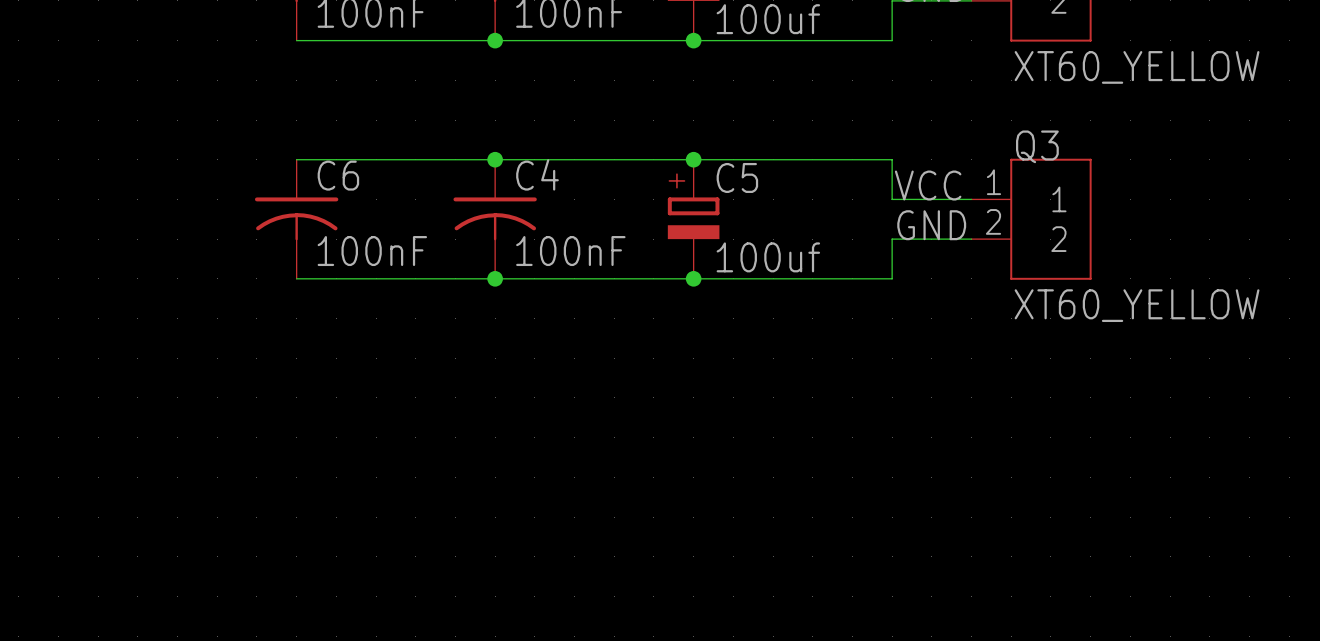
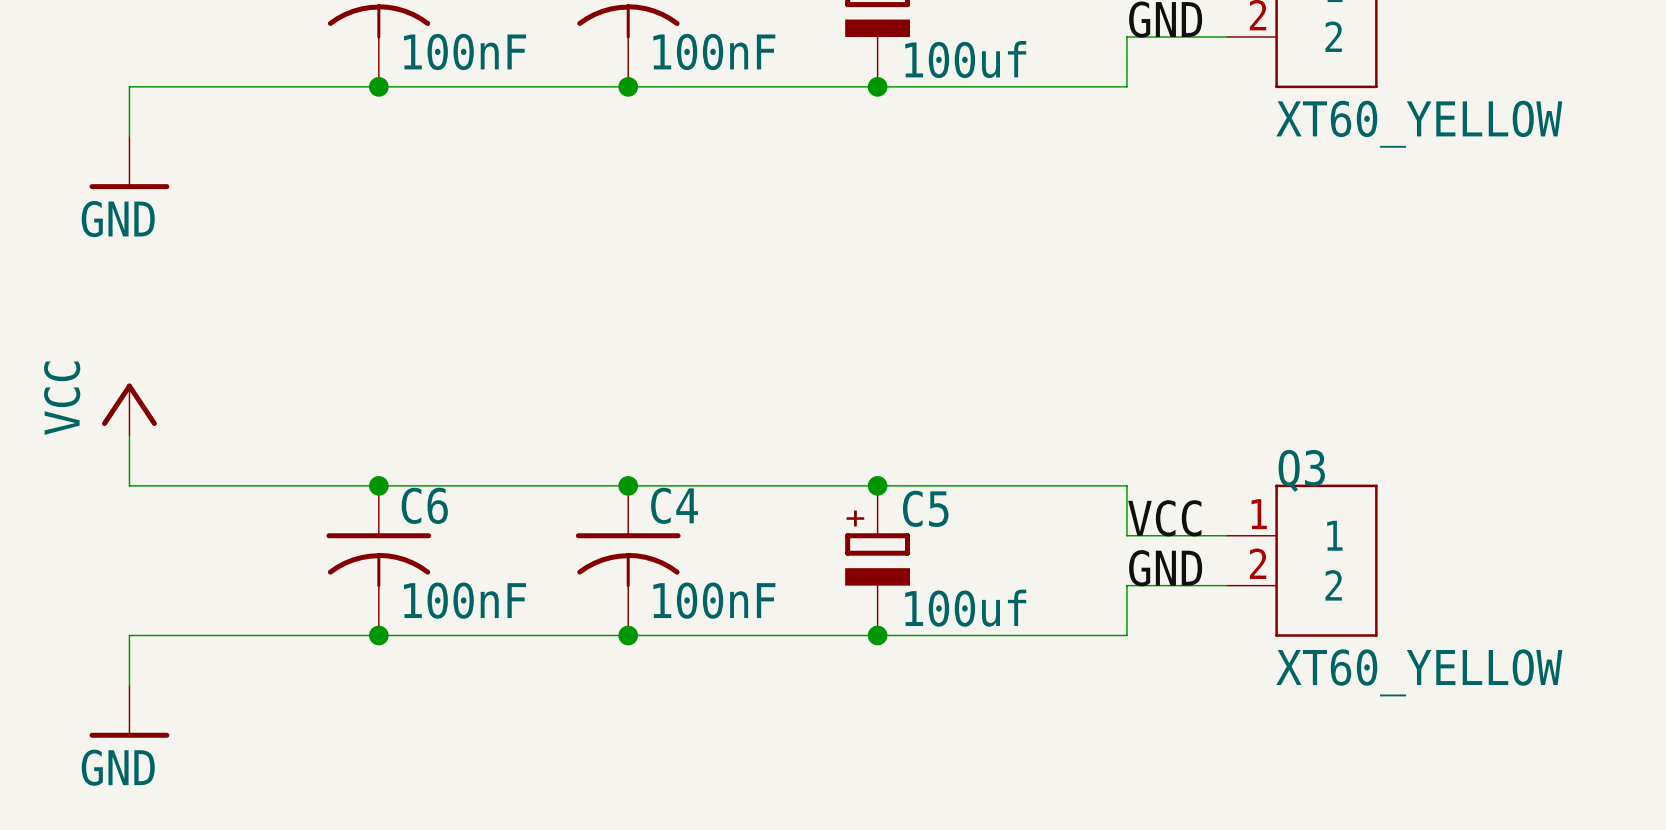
wire: none -> (378, 86) (129, 86) (129, 136)
junction: none -> (378, 86)
power symbol: none -> GND (129, 162)
wire: (296, 159) (892, 159) (892, 199) (971, 199) -> none
junction: (495, 159) -> none
junction: (693, 159) -> none
label position: VCC (928, 185) -> VCC (1164, 518)
C6 position: (296, 219) -> (378, 560)
C4 position: (495, 219) -> (628, 560)
C5 position: (693, 219) -> (877, 560)
Q3 position: (1031, 219) -> (1302, 560)
label position: GND (931, 225) -> GND (1165, 568)
wire: (971, 239) (892, 239) (892, 278) (296, 278) -> none
junction position: (495, 278) -> (628, 485)
junction position: (693, 278) -> (877, 485)
power symbol: none -> VCC (129, 409)
wire: none -> (129, 436) (129, 485) (1126, 485) (1126, 535) (1226, 535)
junction: none -> (378, 485)
wire: none -> (1226, 585) (1126, 585) (1126, 635) (129, 635) (129, 685)
junction: none -> (378, 635)
junction: none -> (628, 635)
junction: none -> (877, 635)
power symbol: none -> GND (129, 711)

